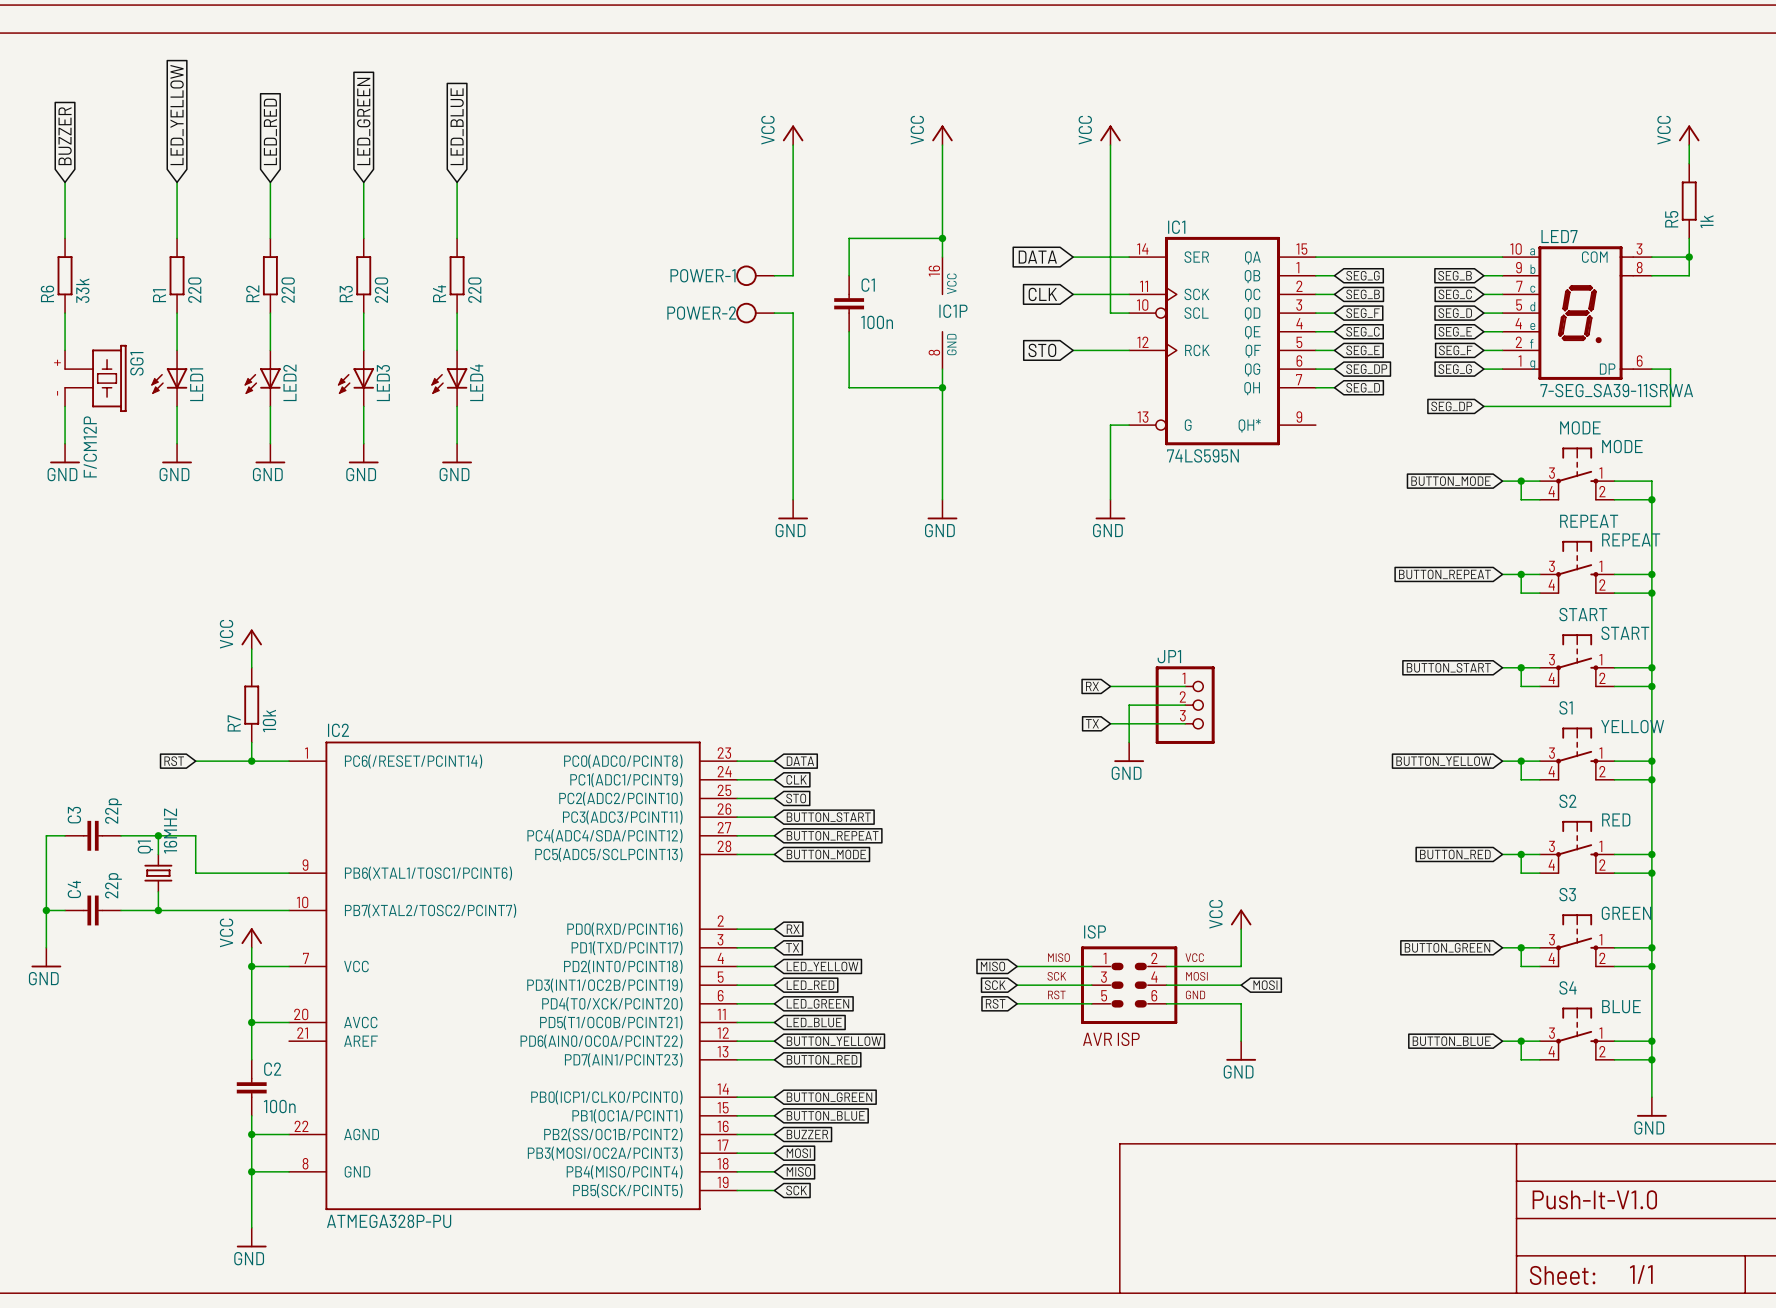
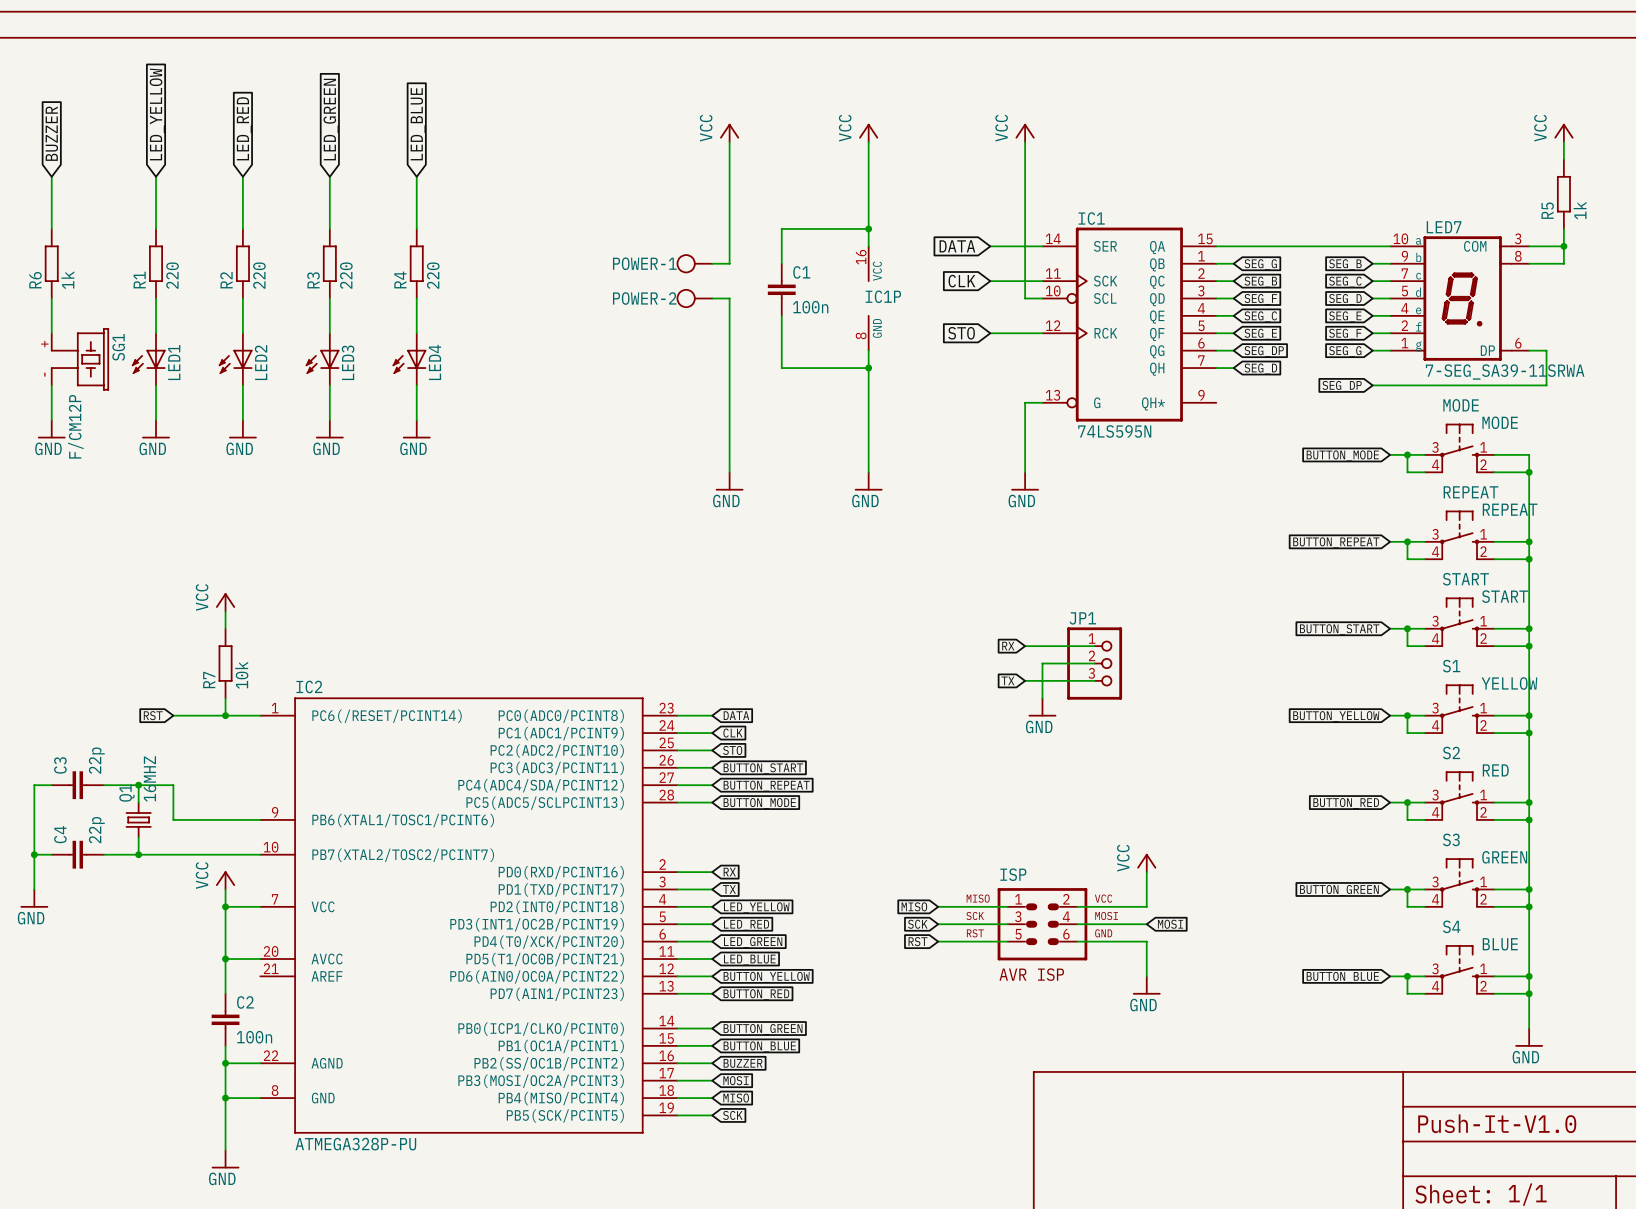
R6 value: 33k (82, 290) -> 1k (67, 280)

